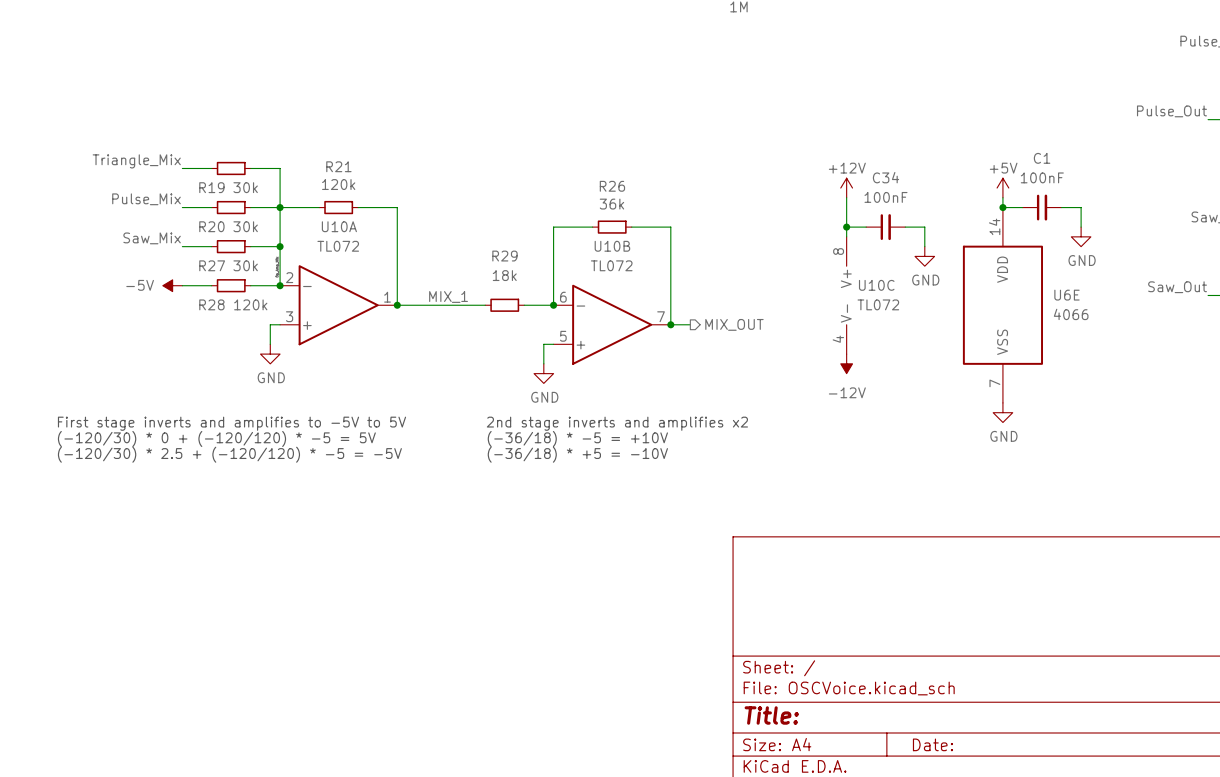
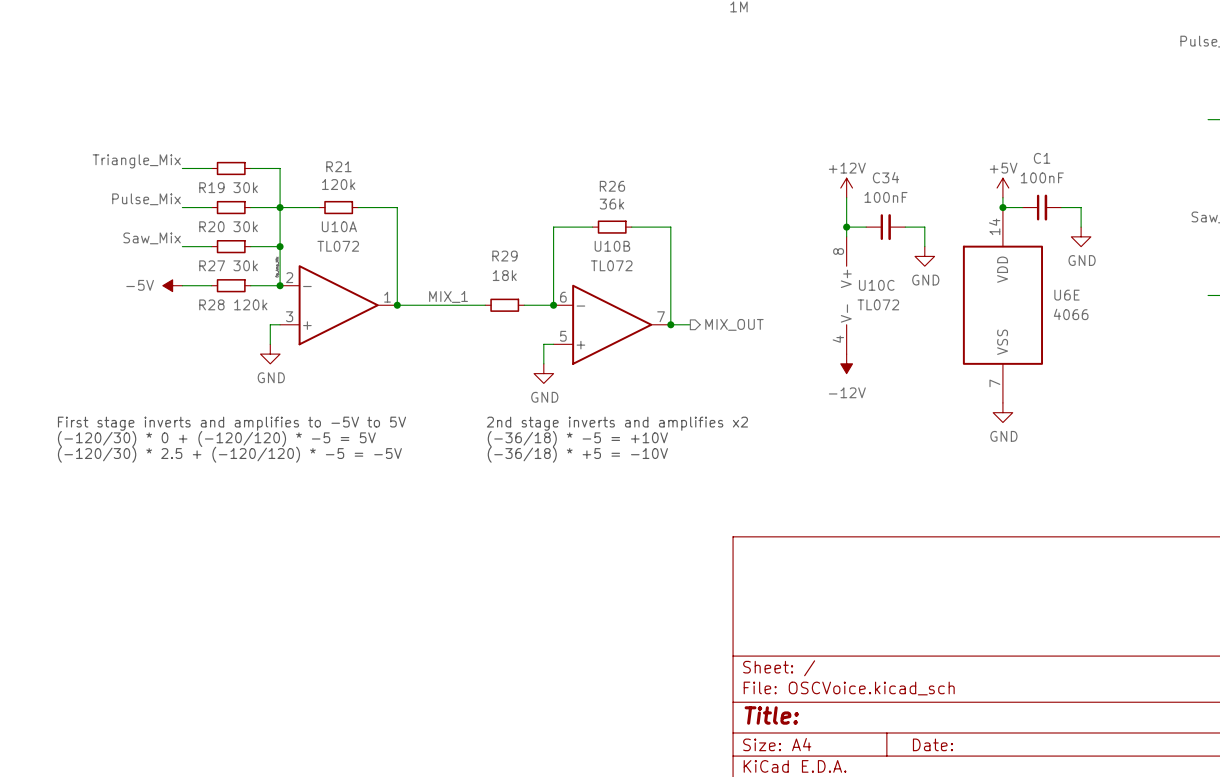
label: Pulse_Out (1171, 111) -> none
label: Saw_Out (1177, 287) -> none

